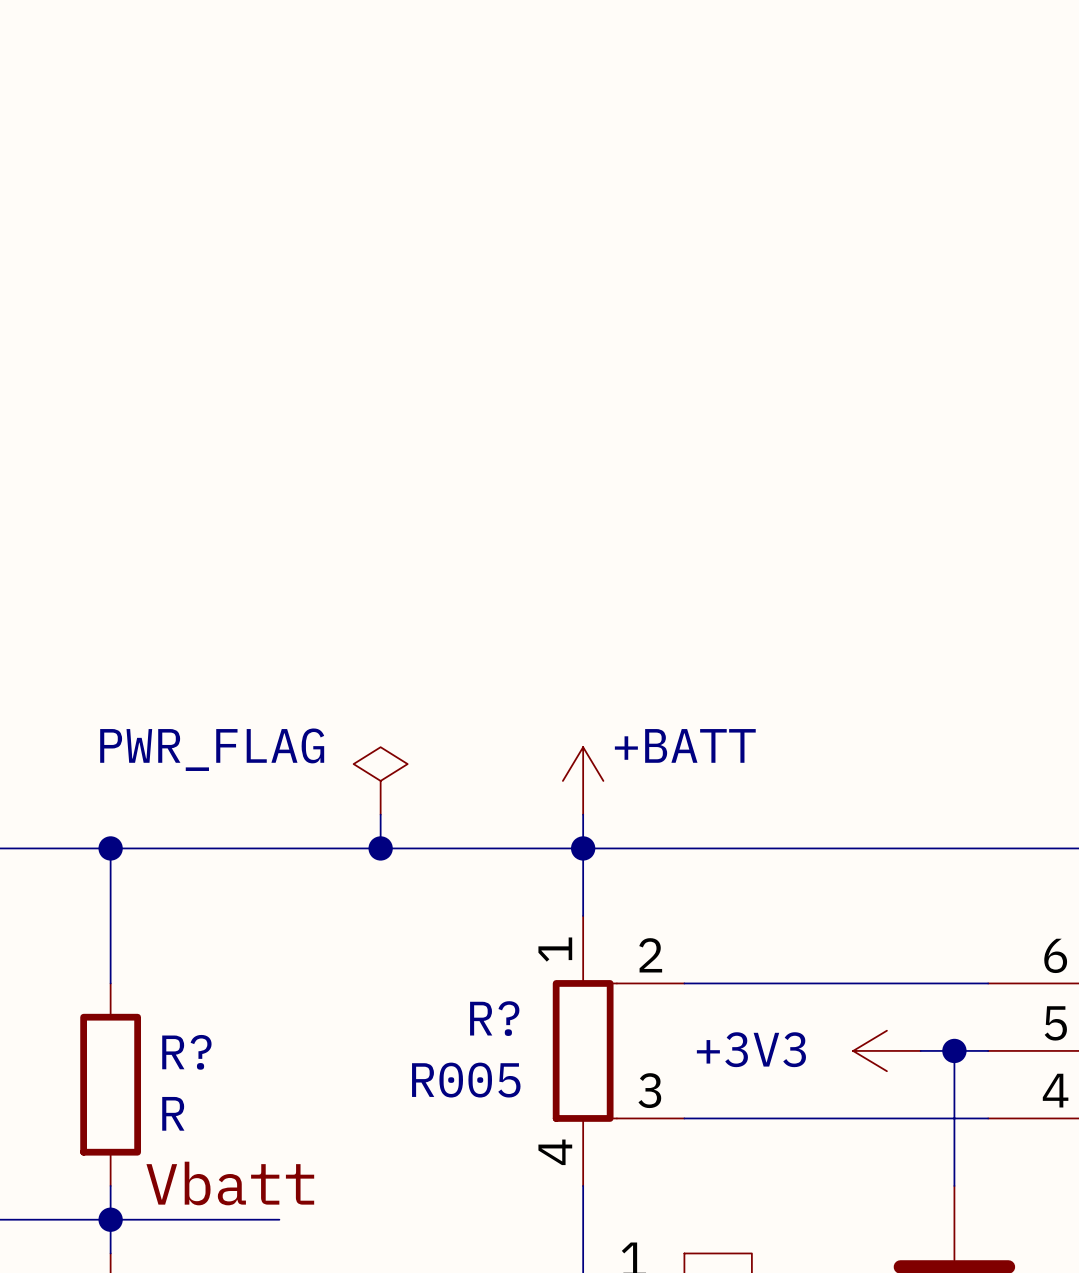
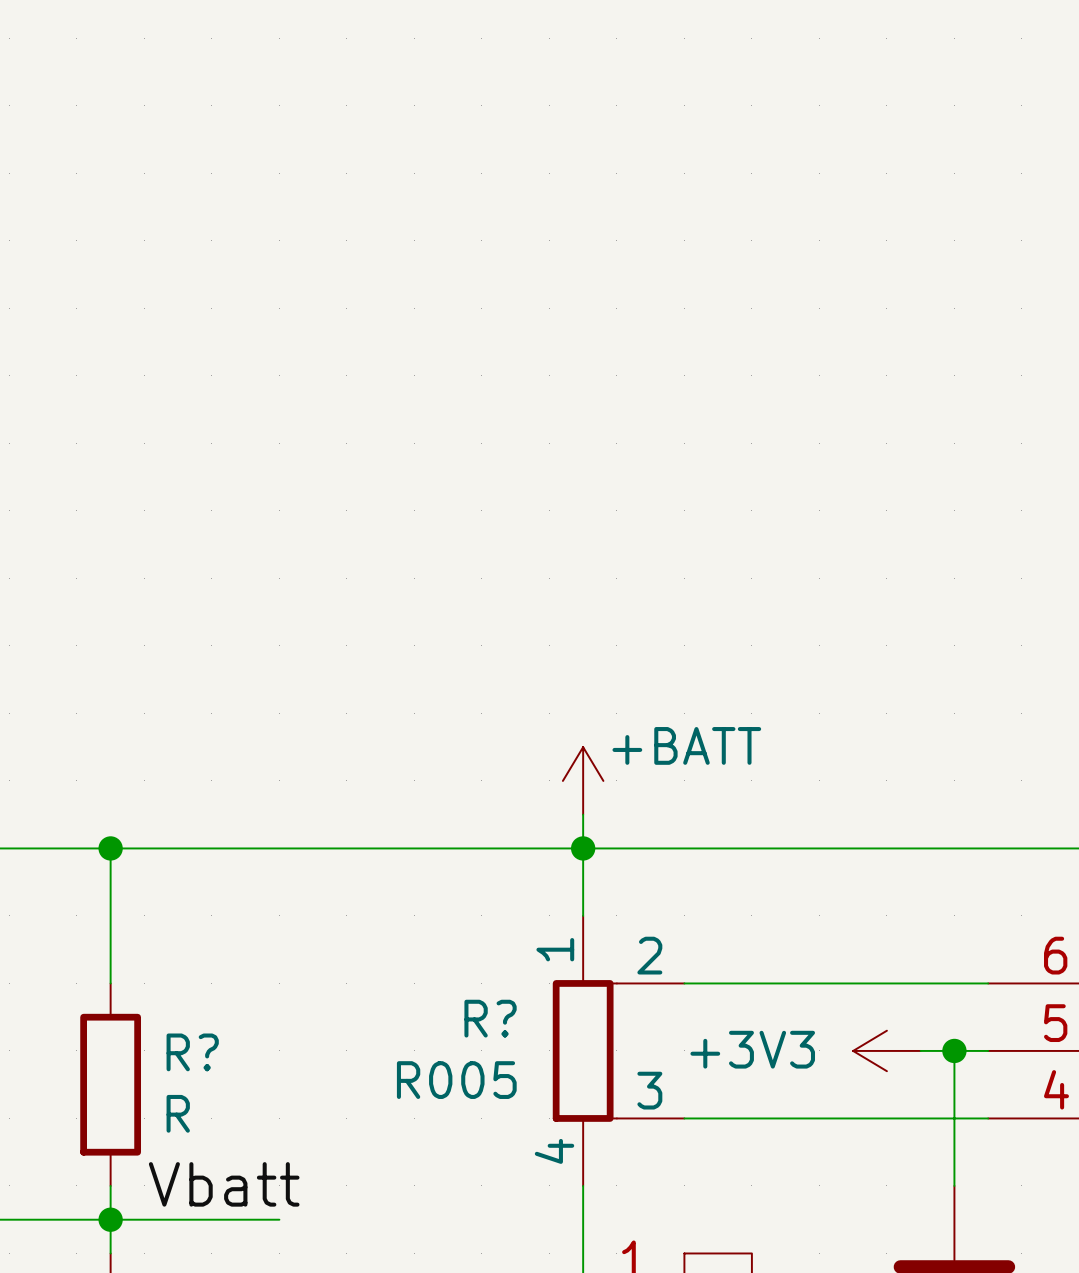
power symbol: PWR_FLAG (380, 780) -> none
wire: (380, 814) (380, 848) -> none
junction: (380, 848) -> none

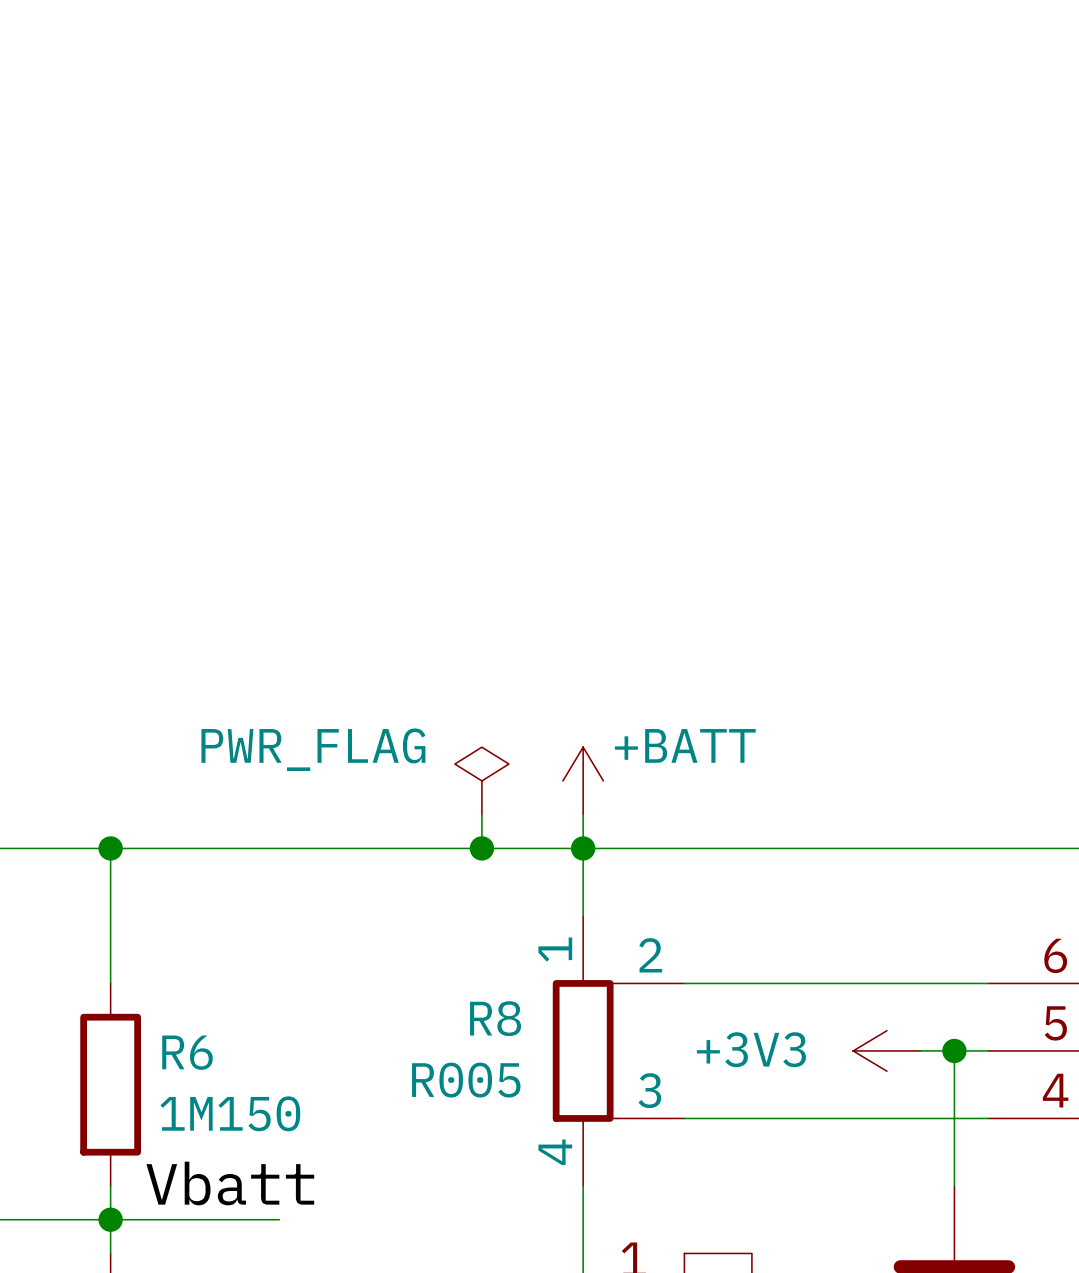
power symbol: none -> PWR_FLAG (481, 780)
wire: none -> (481, 814) (481, 848)
junction: none -> (481, 848)
R? name: R? (490, 1018) -> R8 (495, 1018)
R? name: R? (192, 1052) -> R6 (187, 1052)
R? value: R (178, 1113) -> 1M150 (230, 1113)

